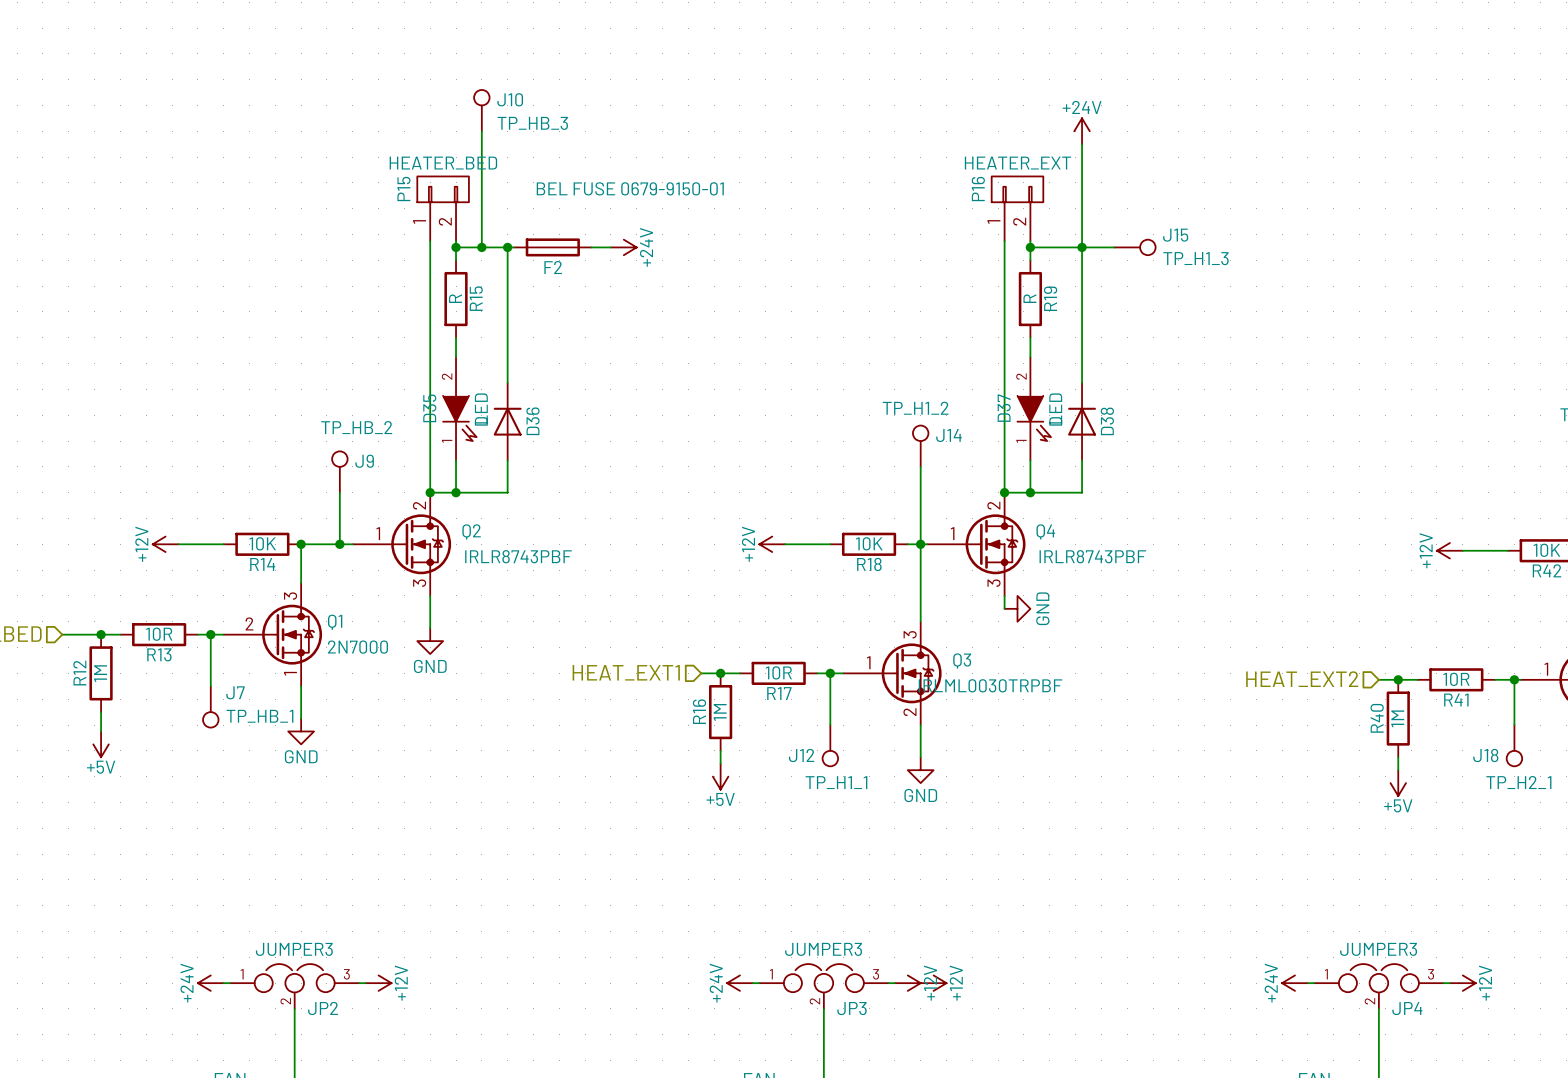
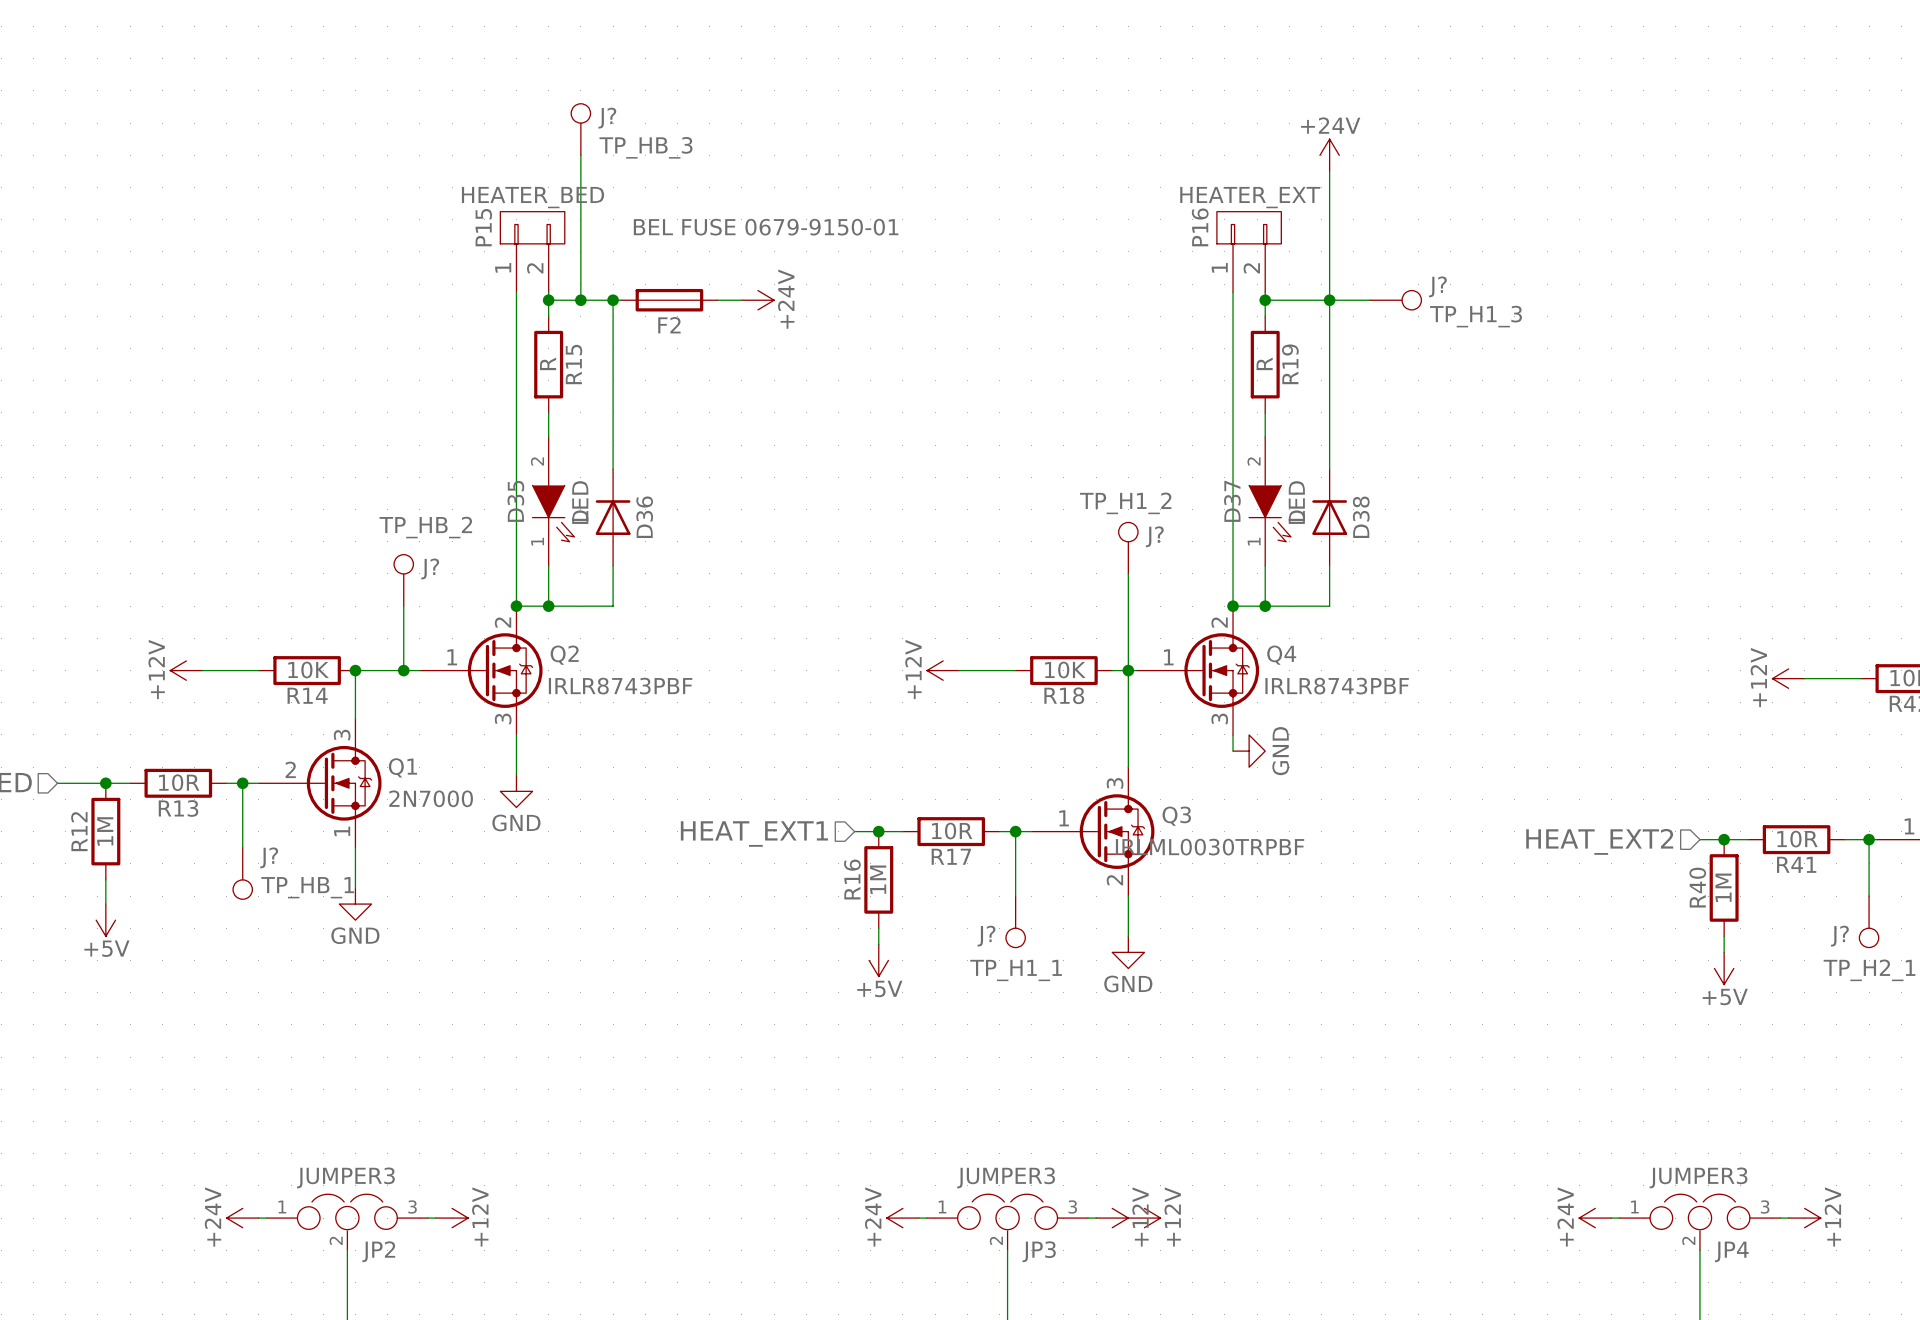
J10 name: J10 (510, 99) -> J? (607, 118)
J15 name: J15 (1175, 235) -> J? (1437, 286)
J14 name: J14 (948, 435) -> J? (1154, 536)
J9 name: J9 (364, 461) -> J? (430, 568)
J7 name: J7 (235, 692) -> J? (269, 857)
J12 name: J12 (801, 755) -> J? (986, 936)
J18 name: J18 (1485, 755) -> J? (1839, 936)

